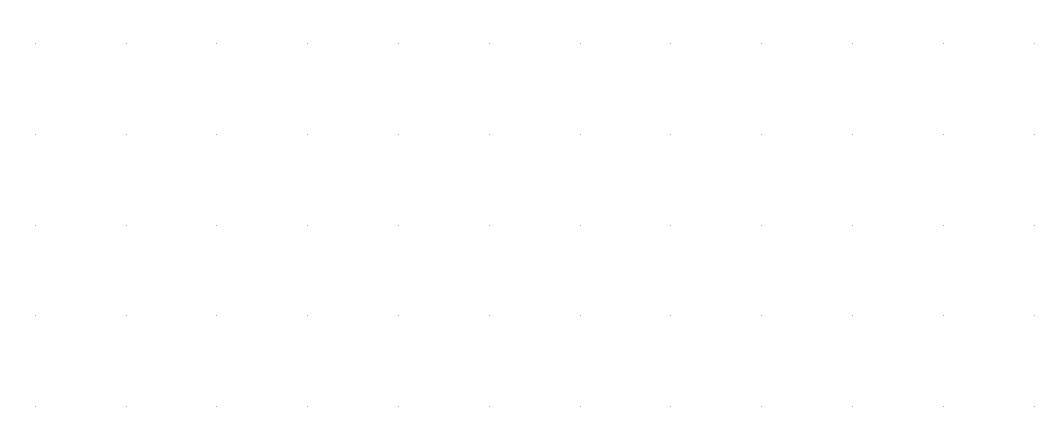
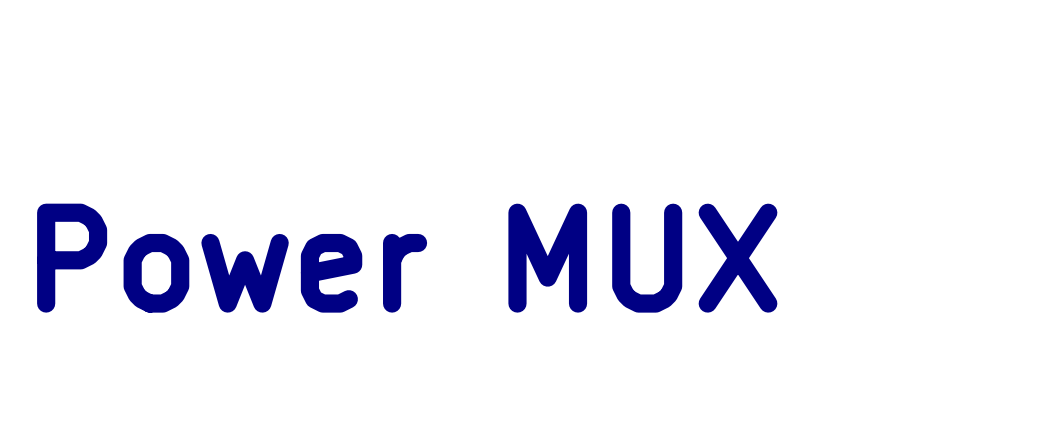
text: none -> Power MUX (407, 258)

